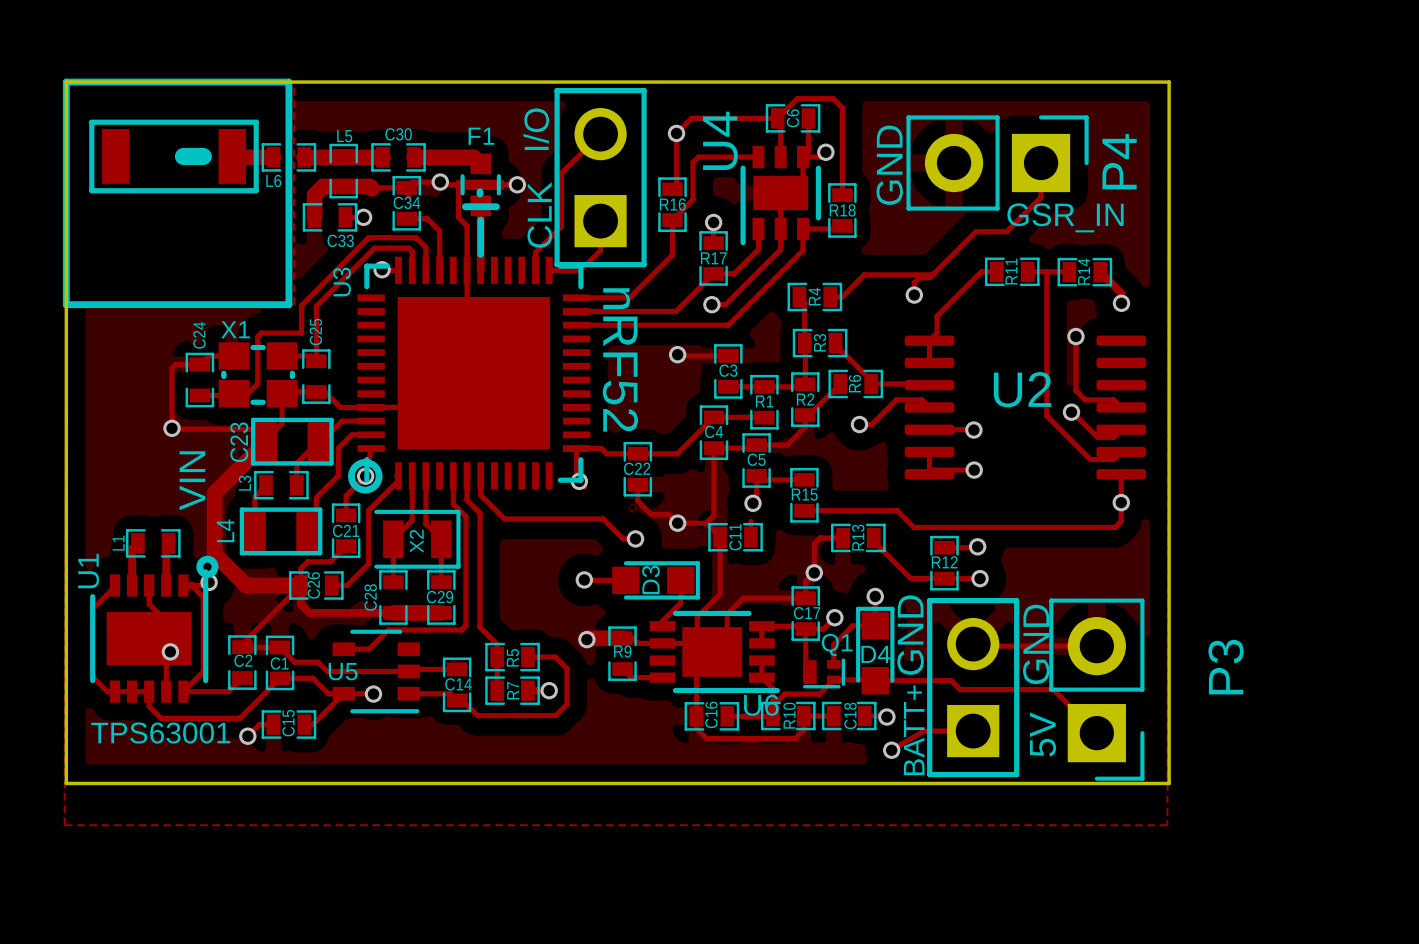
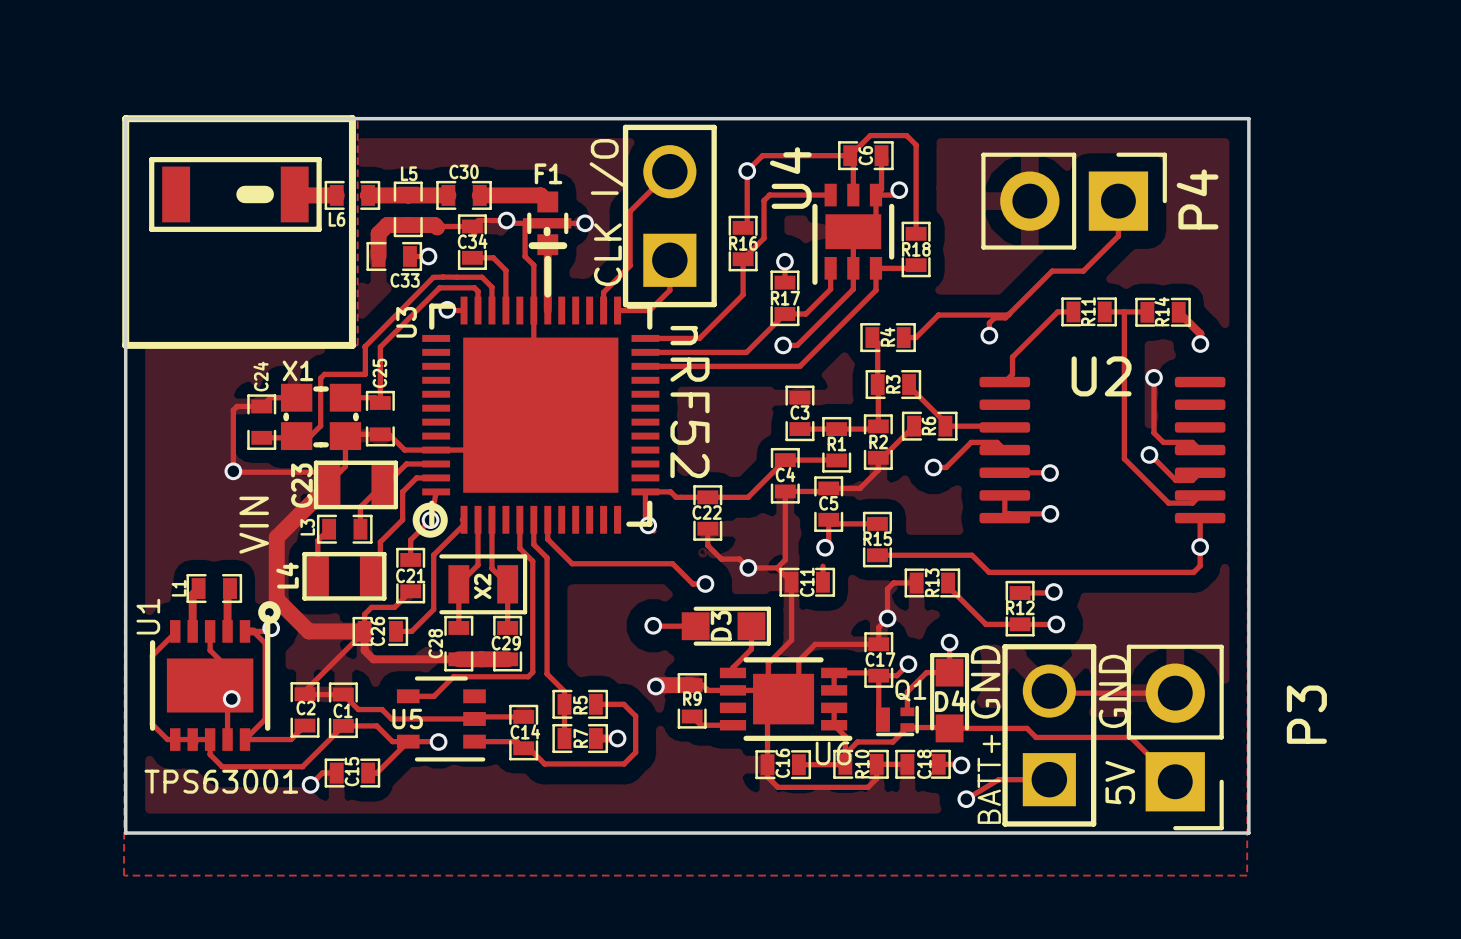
text: GND (889, 165) -> none
text: GSR_IN (1065, 217) -> none
track: (929, 340) (929, 362) -> none
track: (677, 354) (728, 356) -> none
via: (677, 354) -> none
U2 name position: U2 (1022, 389) -> U2 (1101, 376)

